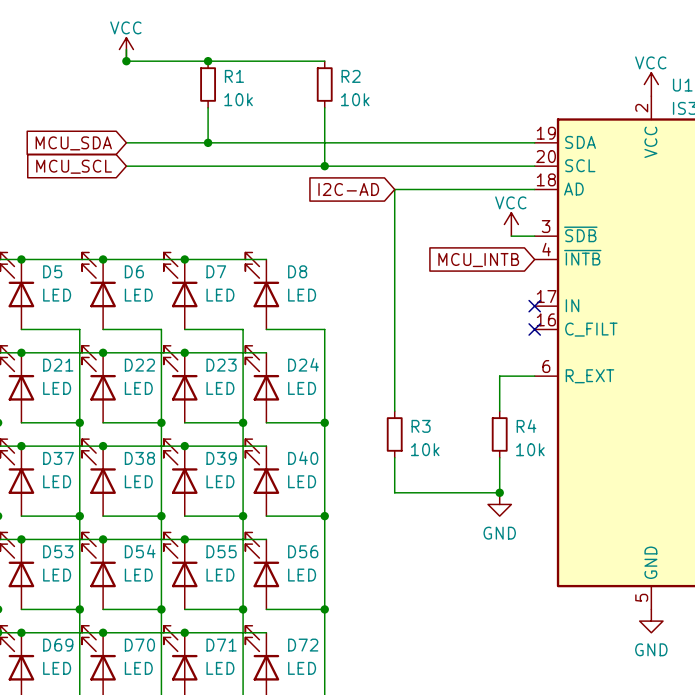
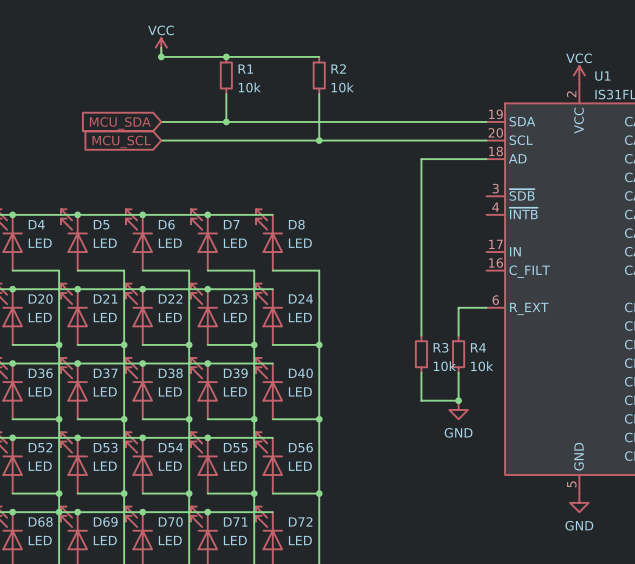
global label: I2C-AD (348, 189) -> none
wire: (453, 189) (394, 189) (394, 411) -> (421, 159) (421, 335)
power symbol: VCC (511, 224) -> none
wire: (511, 236) (534, 236) -> none
global label: MCU_INTB (478, 260) -> none
no-connect mark: (534, 306) -> none
no-connect mark: (534, 329) -> none
R3 position: (394, 434) -> (421, 354)
wire: (394, 457) (394, 492) (453, 492) -> (421, 372) (421, 400)

